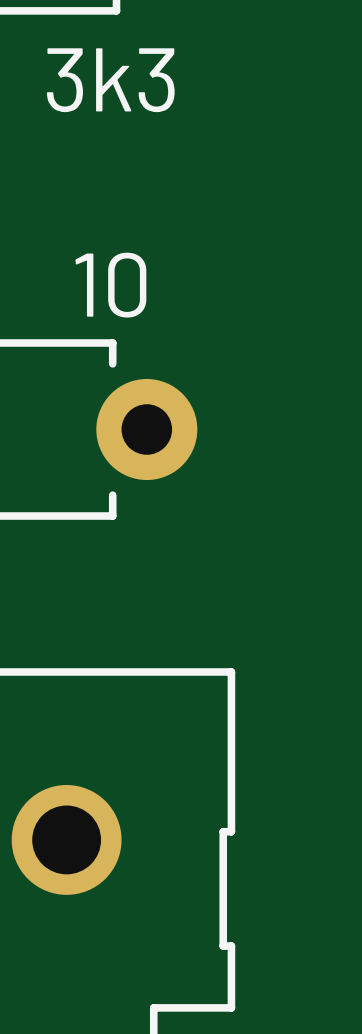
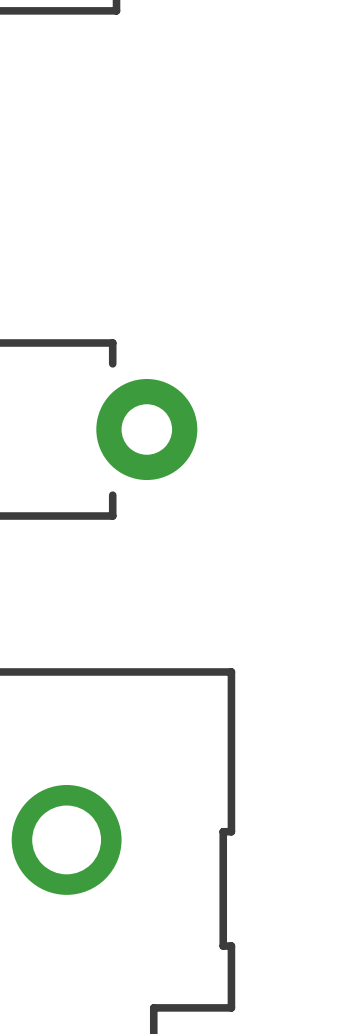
part value: 3k3 (110, 80) -> none
part value: 10 (110, 285) -> none

